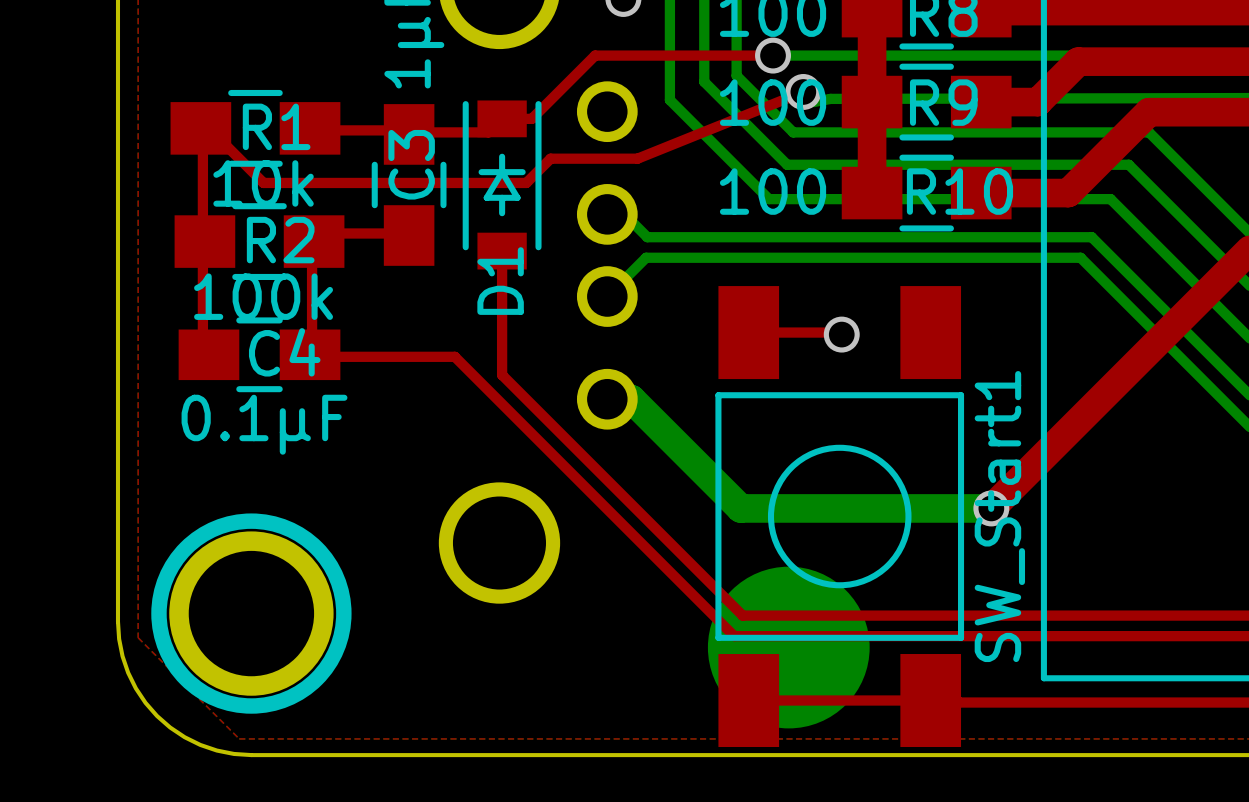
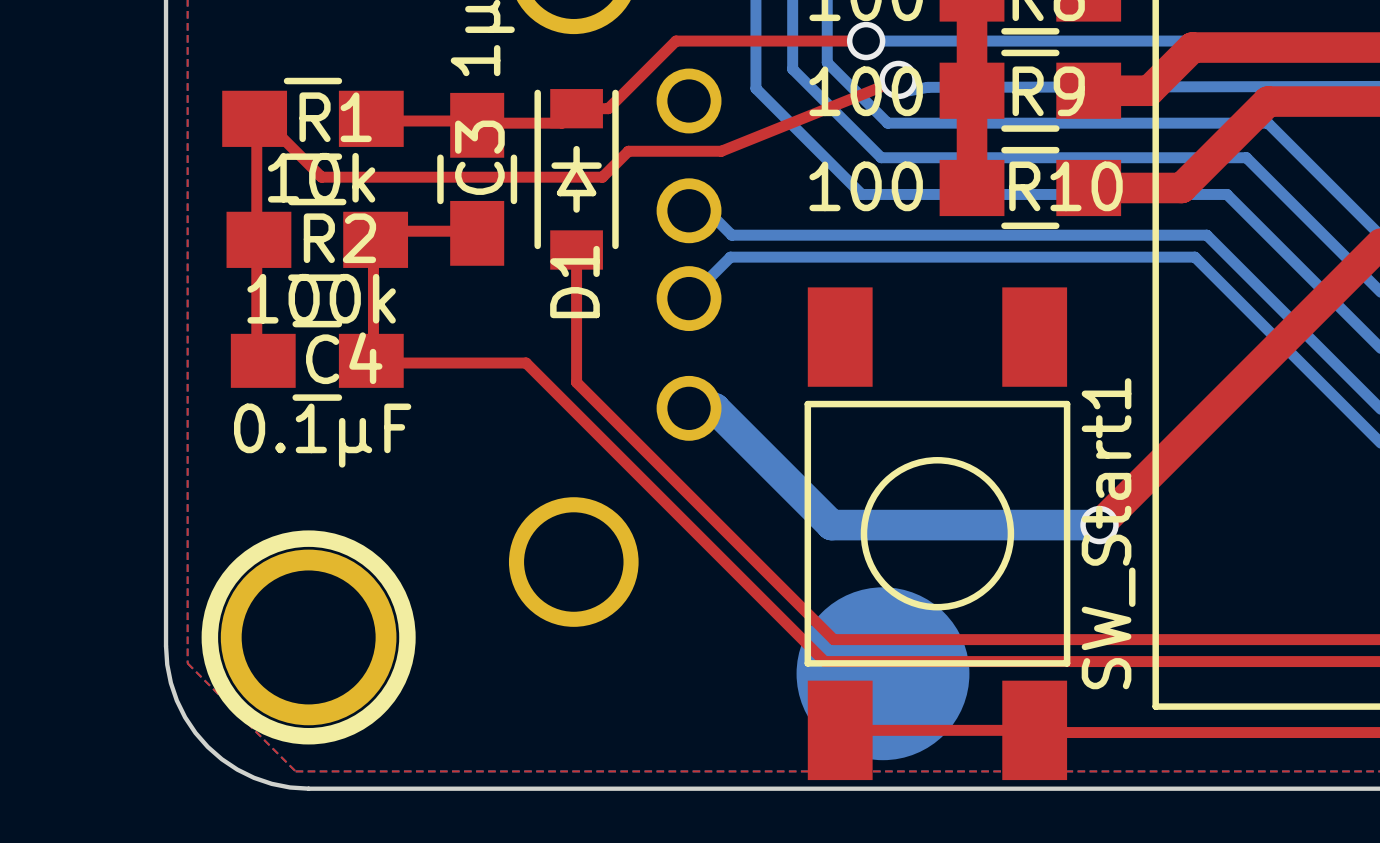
top track: (748, 332) (839, 332) (841, 334) -> none
via: (841, 334) -> none

